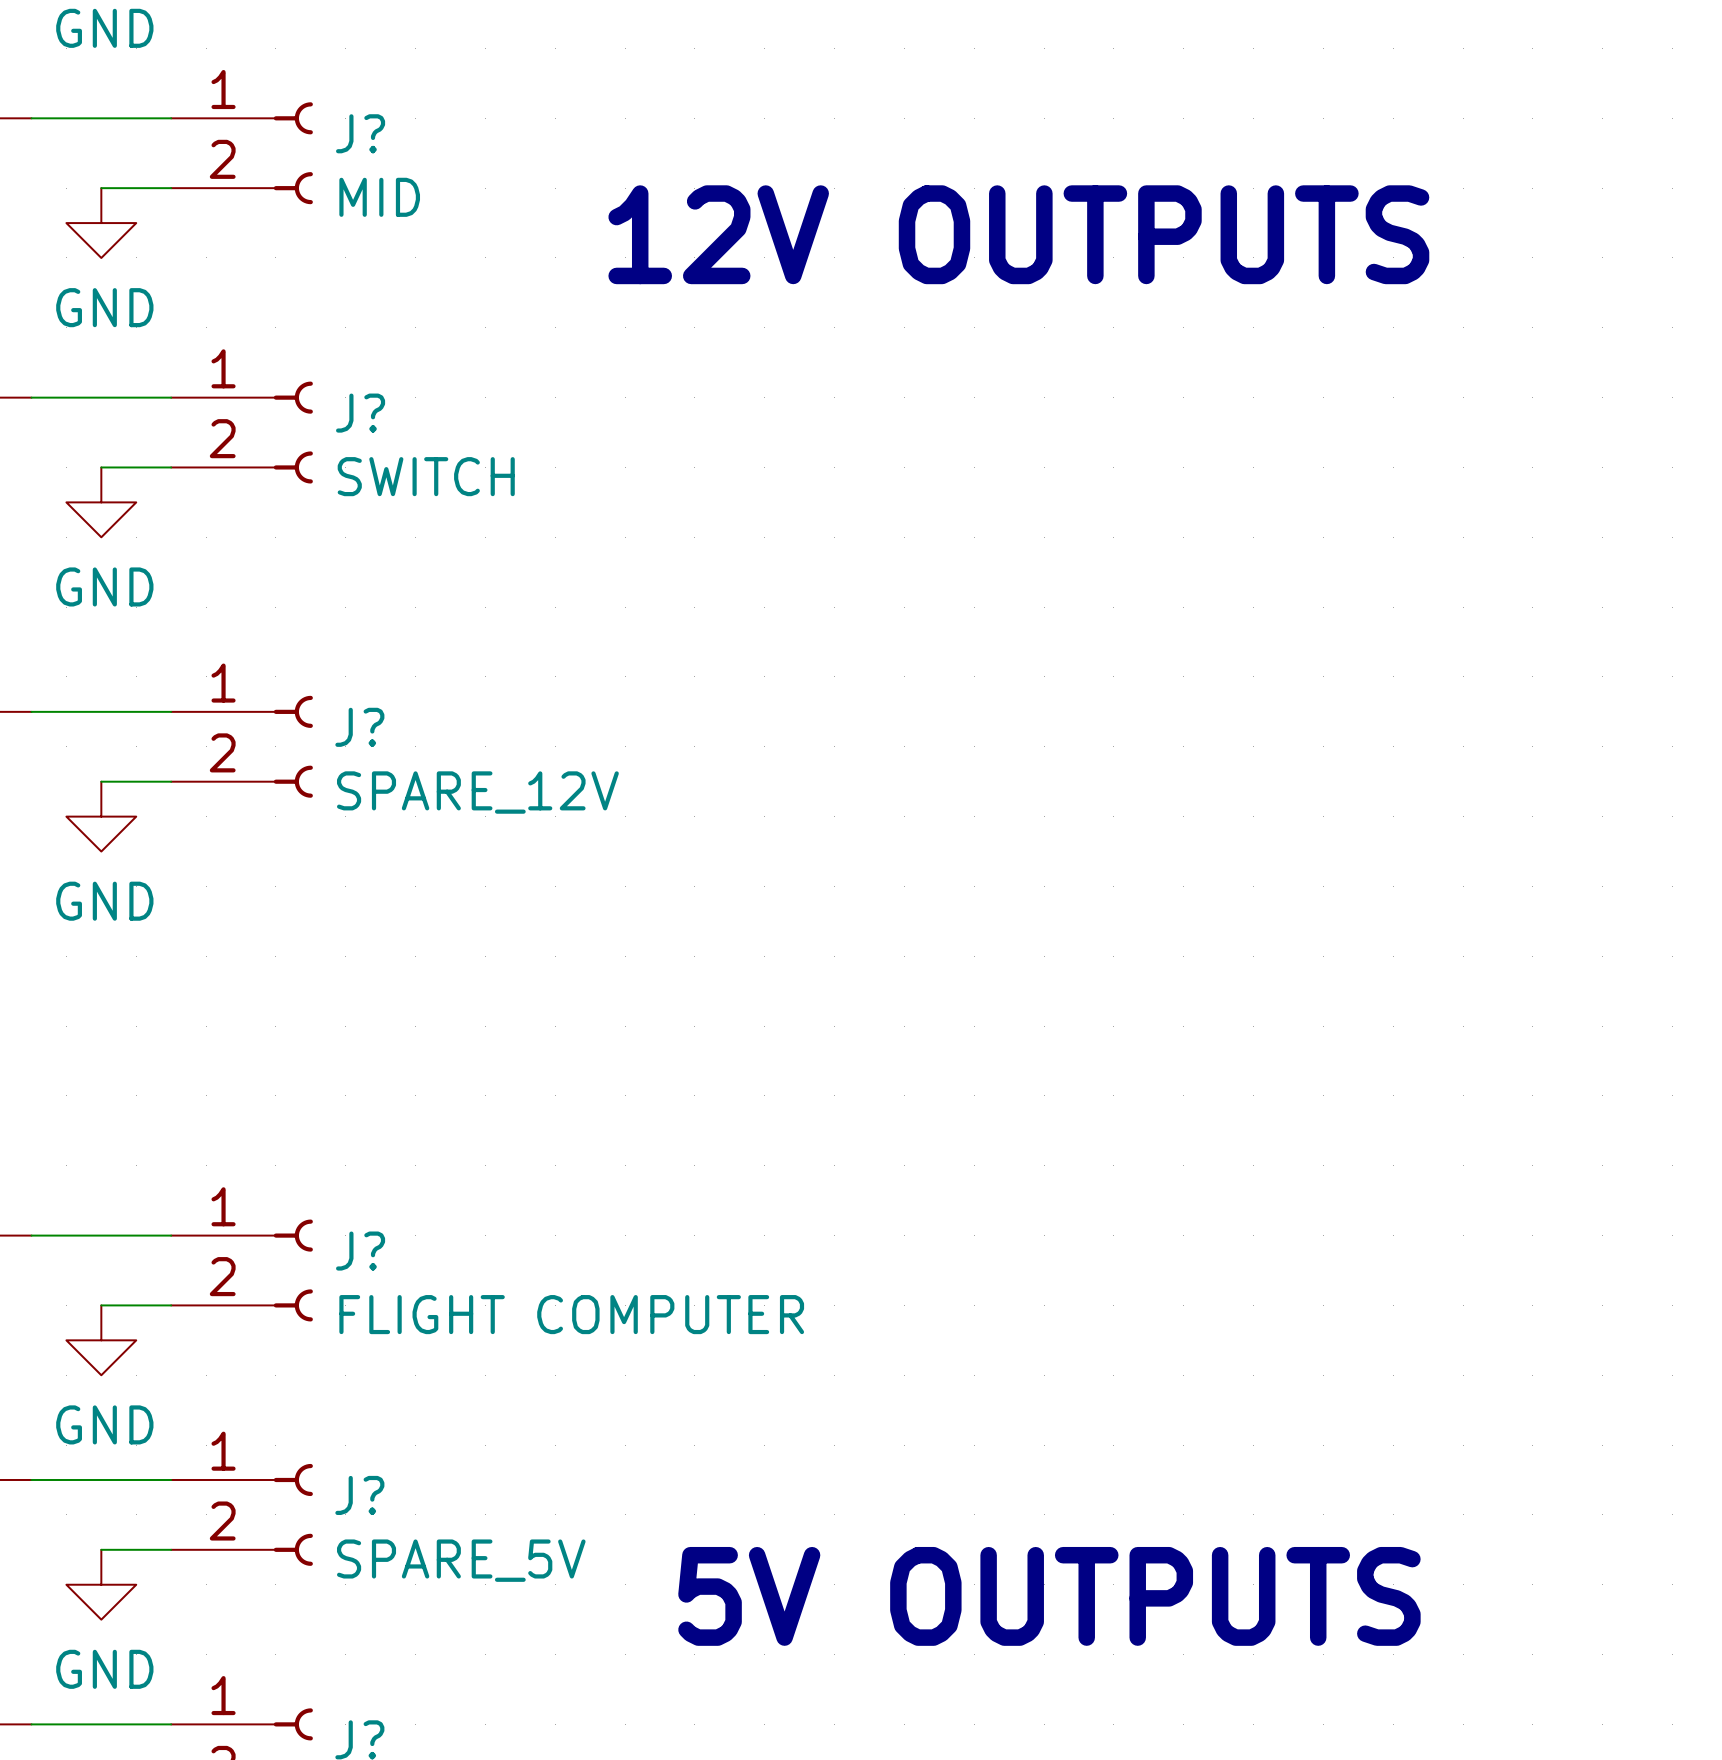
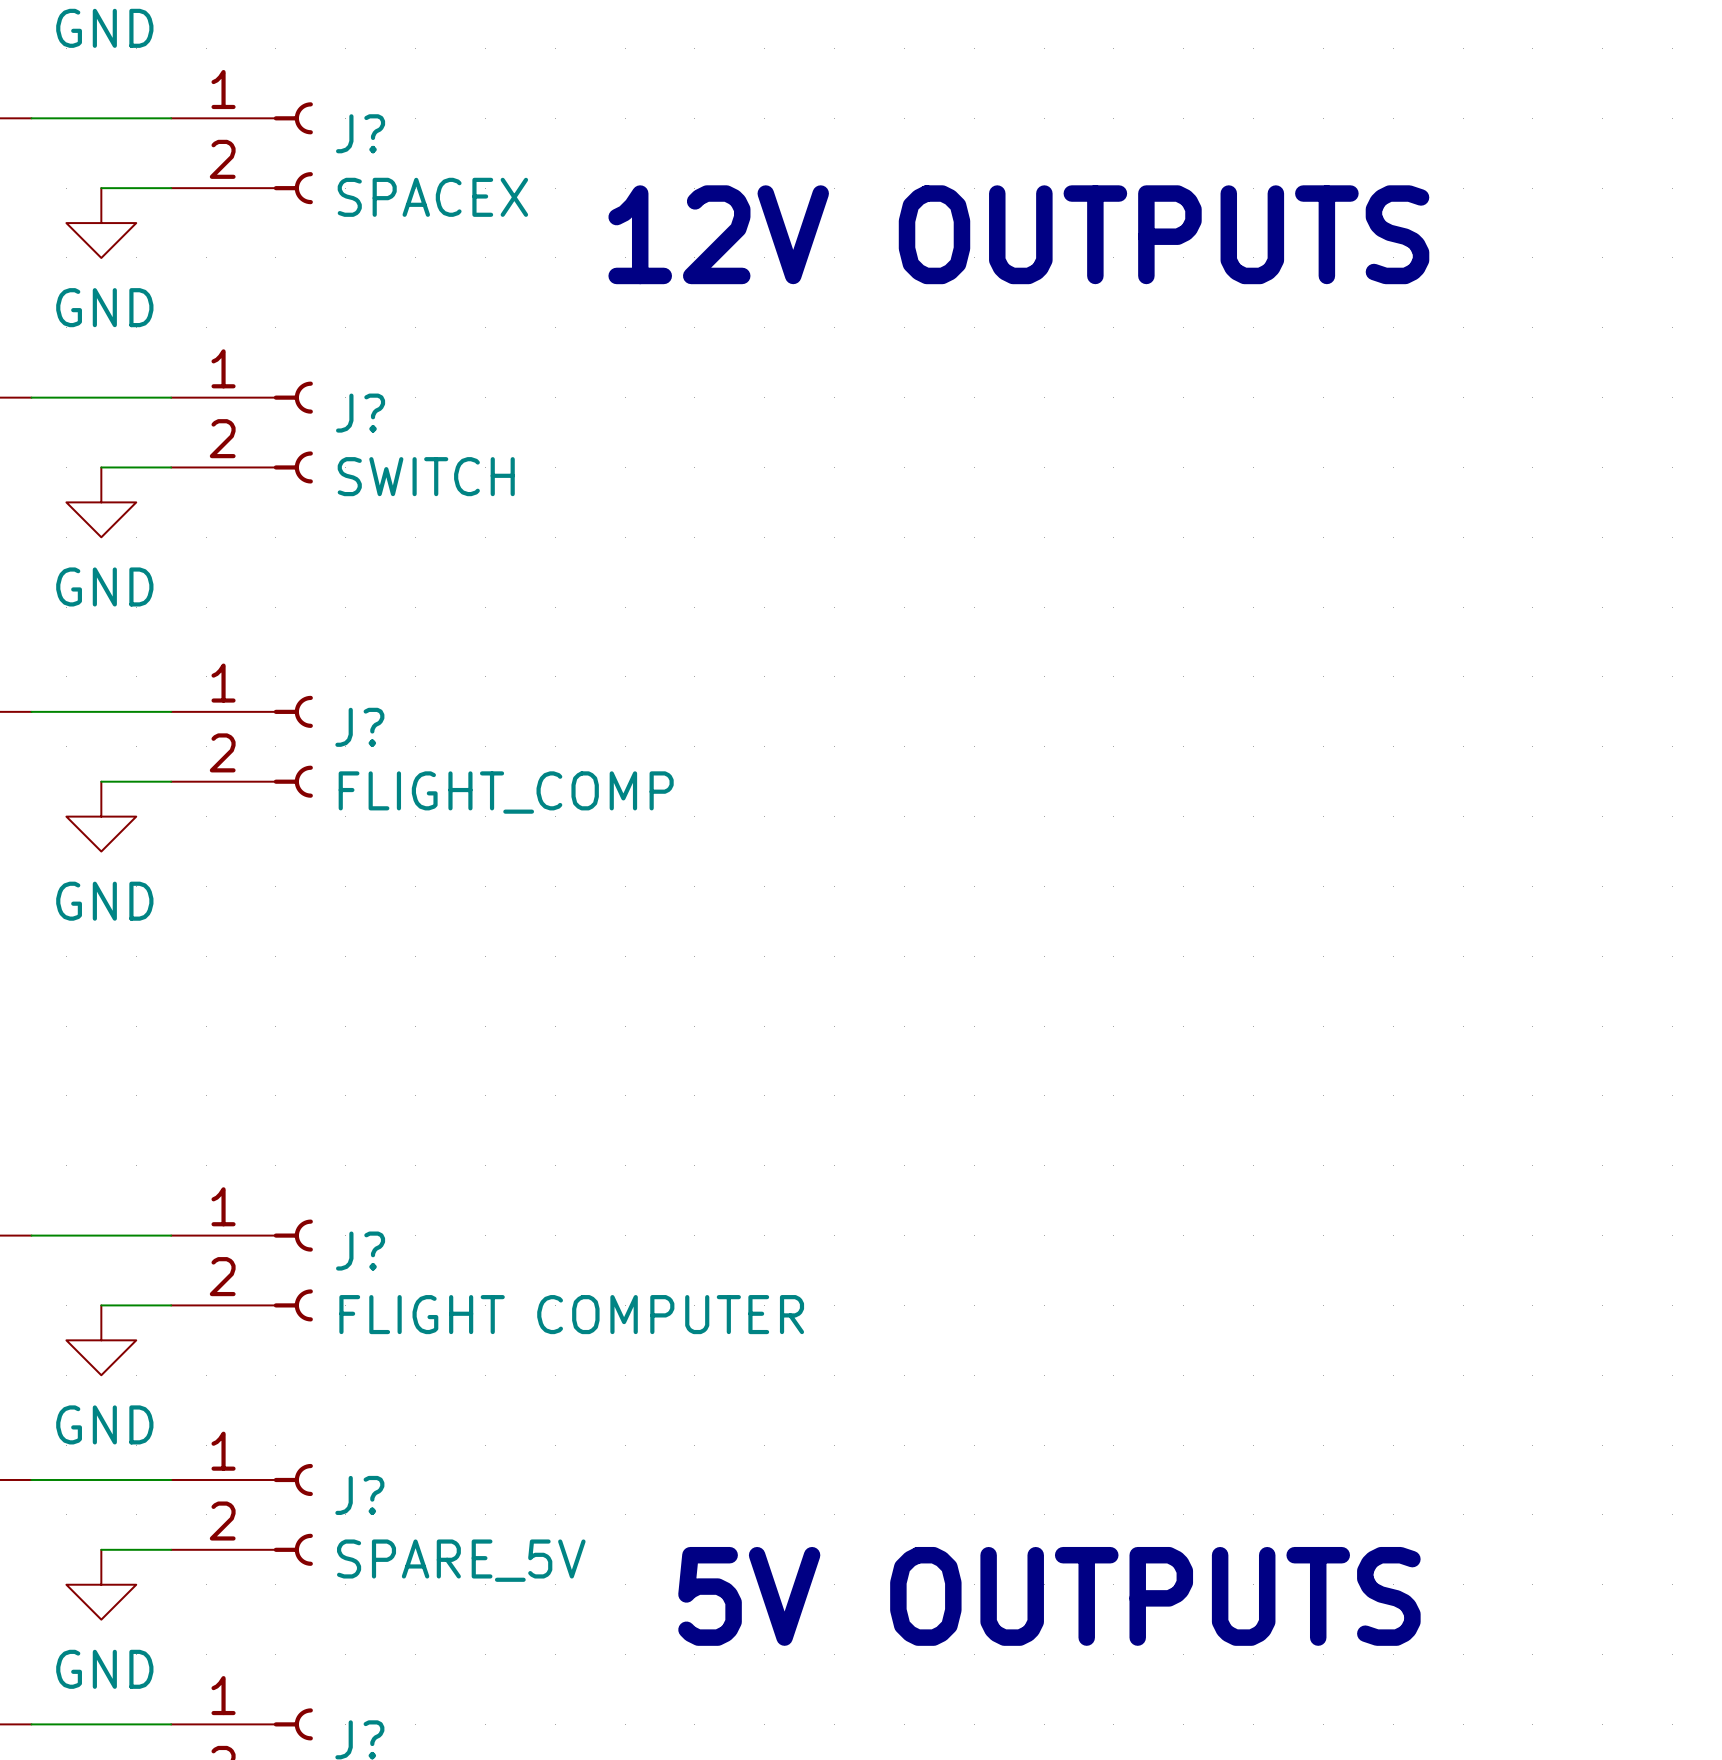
J? value: MID (379, 197) -> SPACEX (432, 197)
J? value: SPARE_12V (477, 792) -> FLIGHT_COMP (506, 792)

